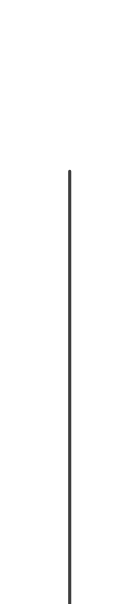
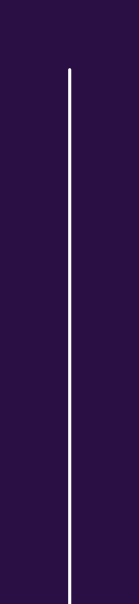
line: none -> (69, 69) (69, 171)

